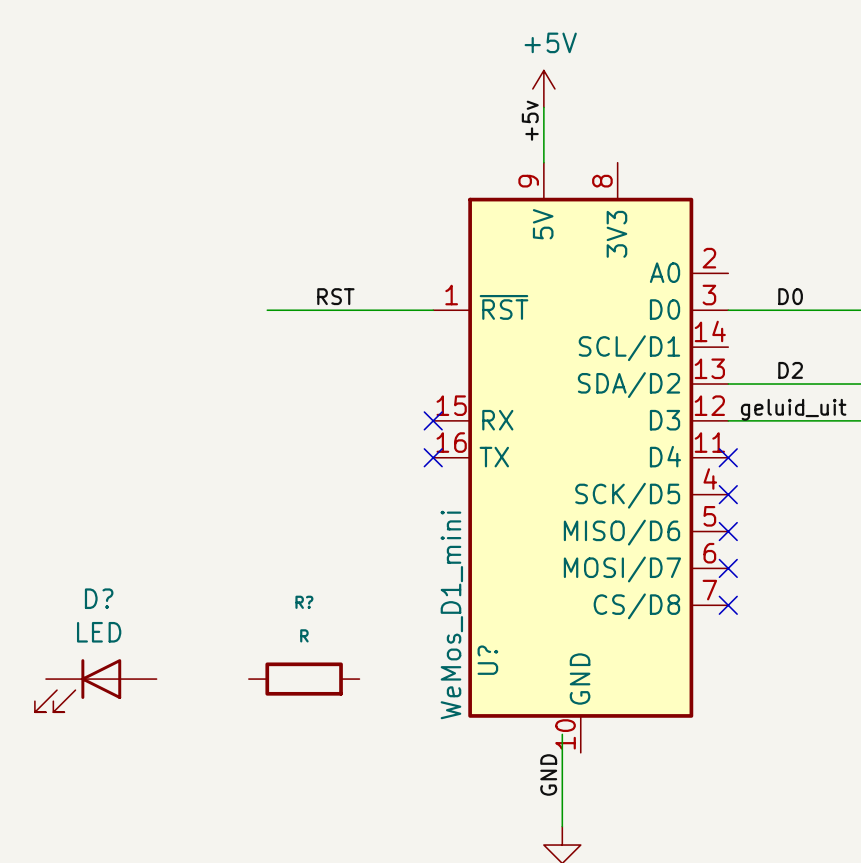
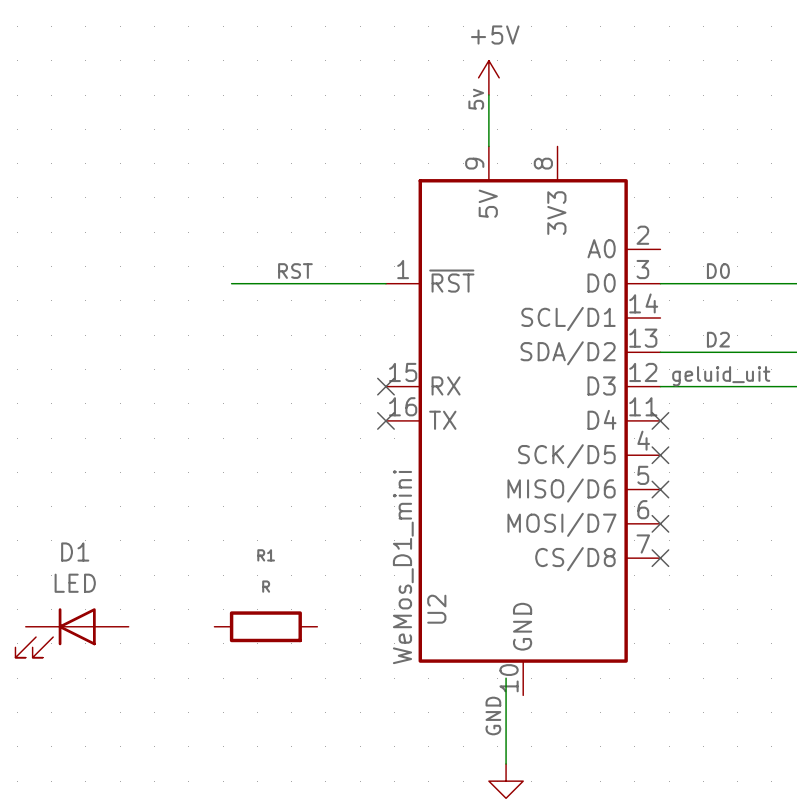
label: +5v (530, 120) -> 5v (476, 99)
D? name: D? (99, 598) -> D1 (75, 552)
R? name: R? (304, 602) -> R1 (266, 555)
U? name: U? (487, 660) -> U2 (436, 609)

